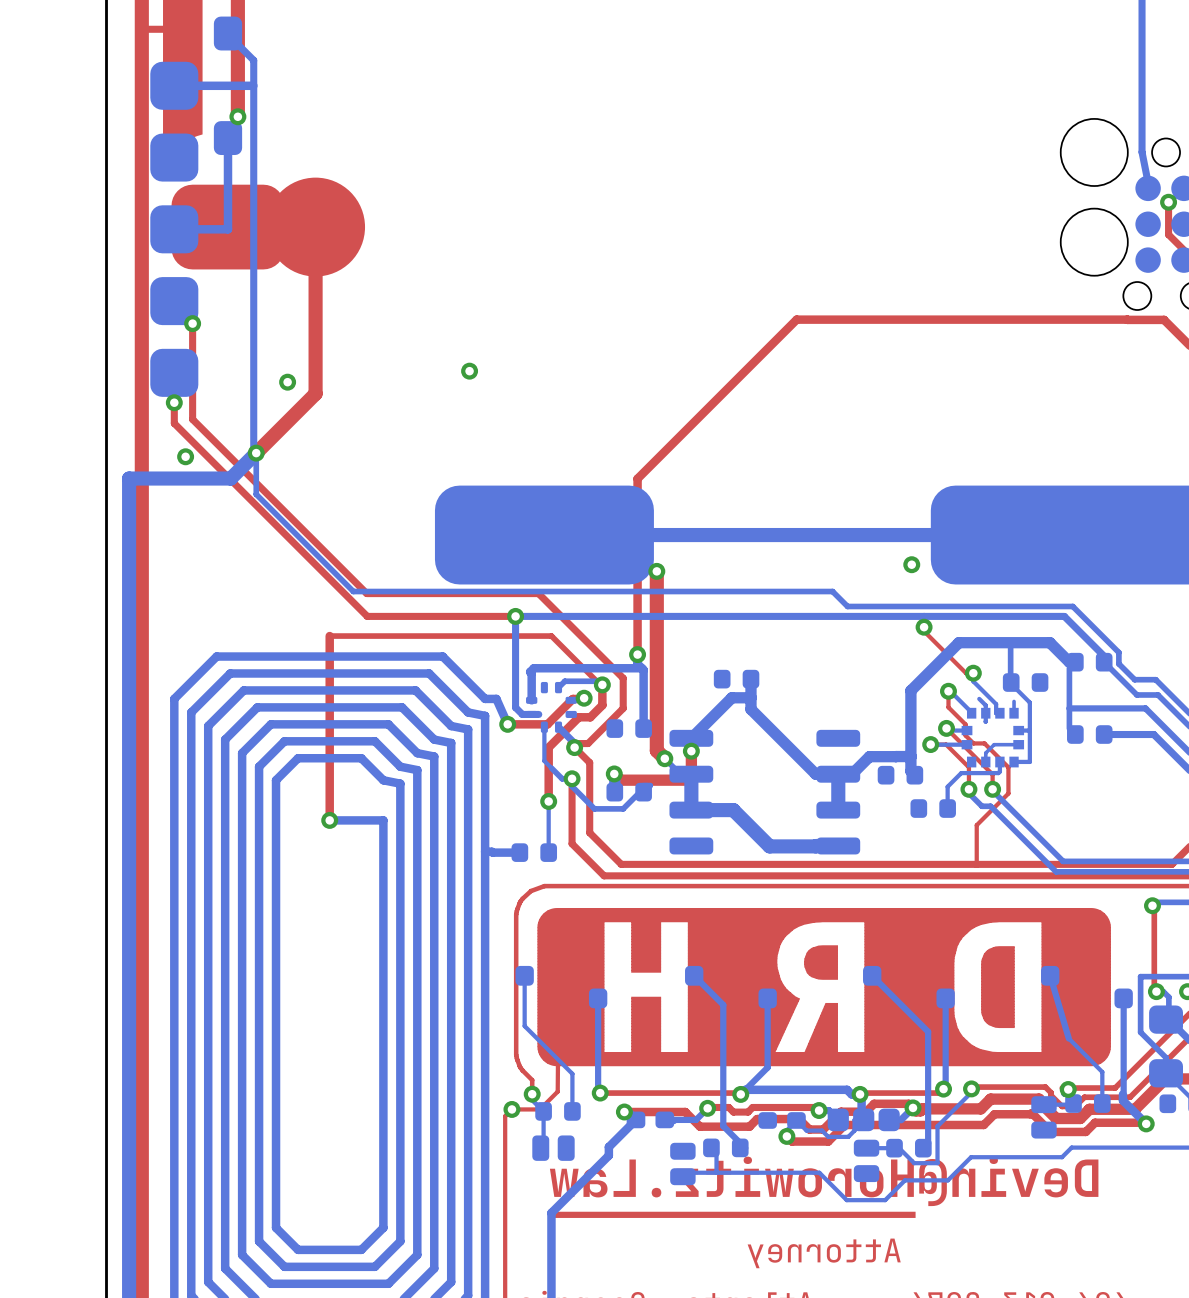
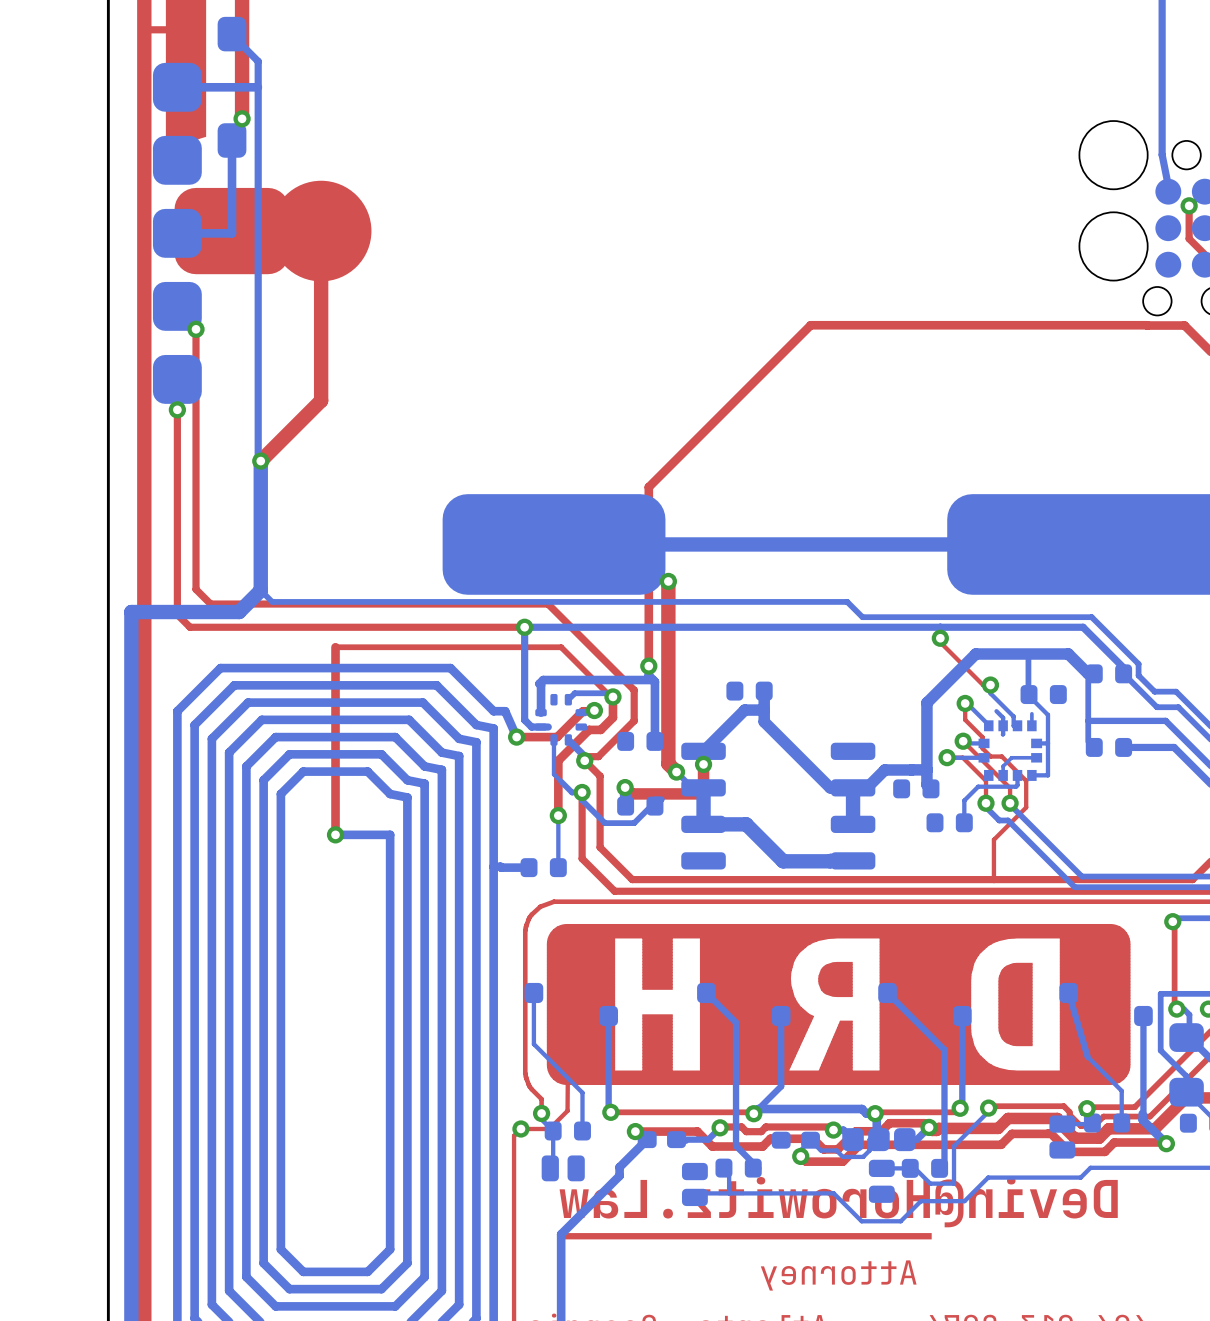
via: (469, 371) -> none
via: (287, 382) -> none
top track: (192, 419) (366, 593) -> (196, 426) (196, 589) (210, 604) (373, 604)
top track: (174, 423) (367, 616) -> (177, 430) (177, 614) (190, 627) (373, 627)
bottom track: (256, 453) (230, 478) (129, 478) (129, 601) -> (260, 590) (239, 612) (131, 612)
bottom track width: thin (256, 453) (256, 494) -> thick (260, 461) (260, 503)
via: (185, 456) -> none
bottom track: (256, 494) (353, 591) -> (260, 590) (272, 601) (359, 601)
bottom track: none -> (260, 503) (260, 590)
via: (911, 564) -> none

